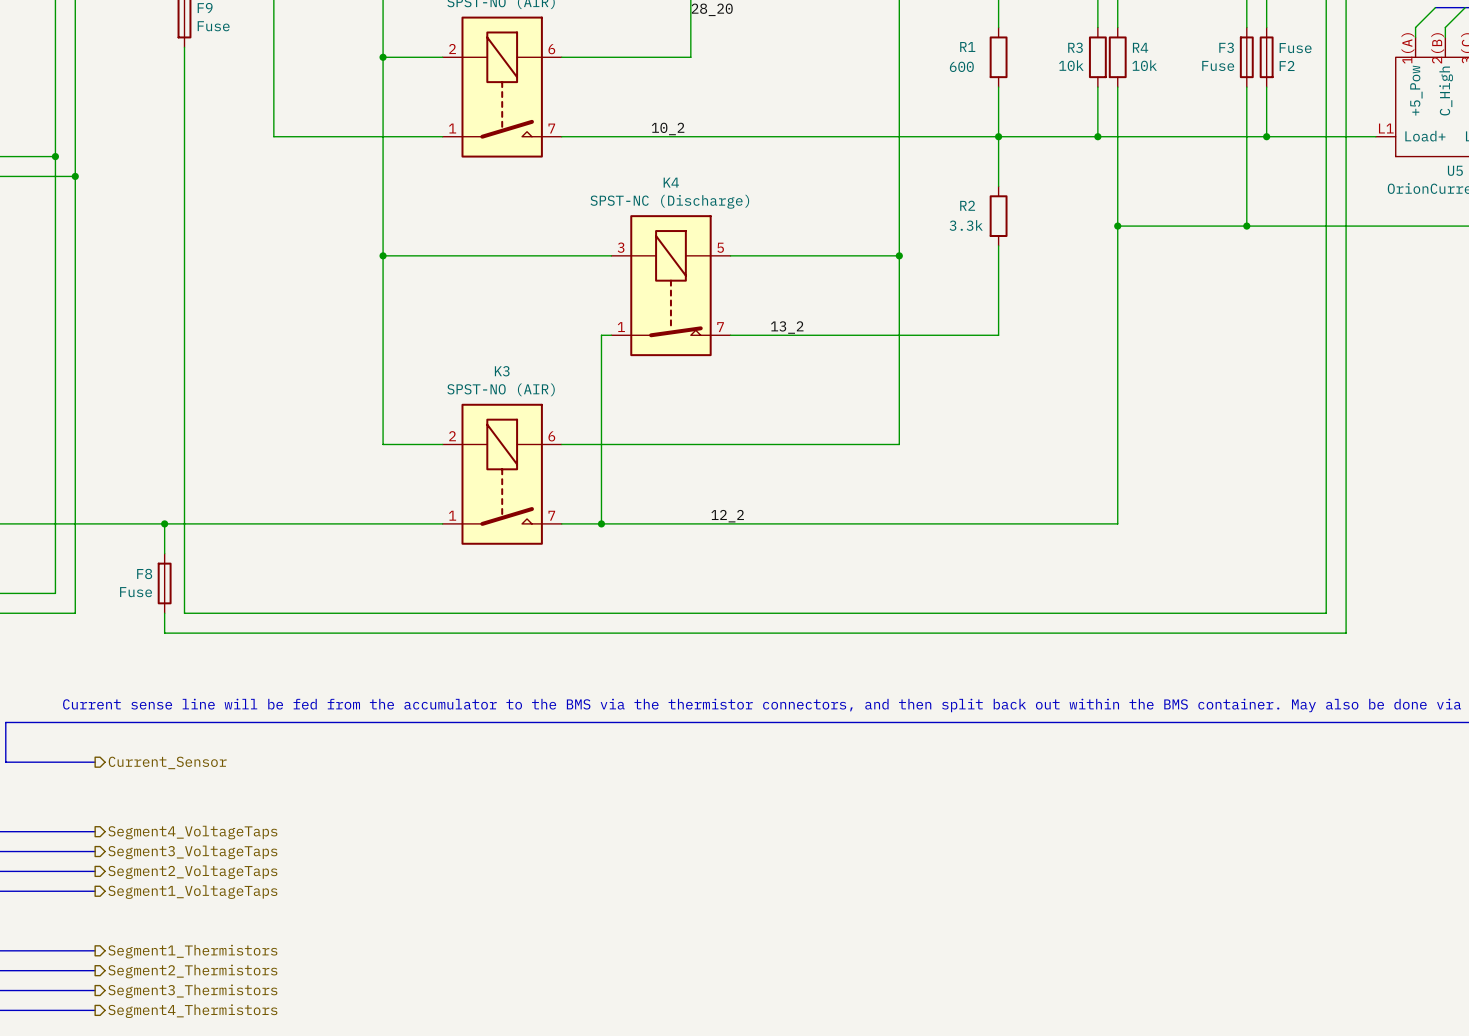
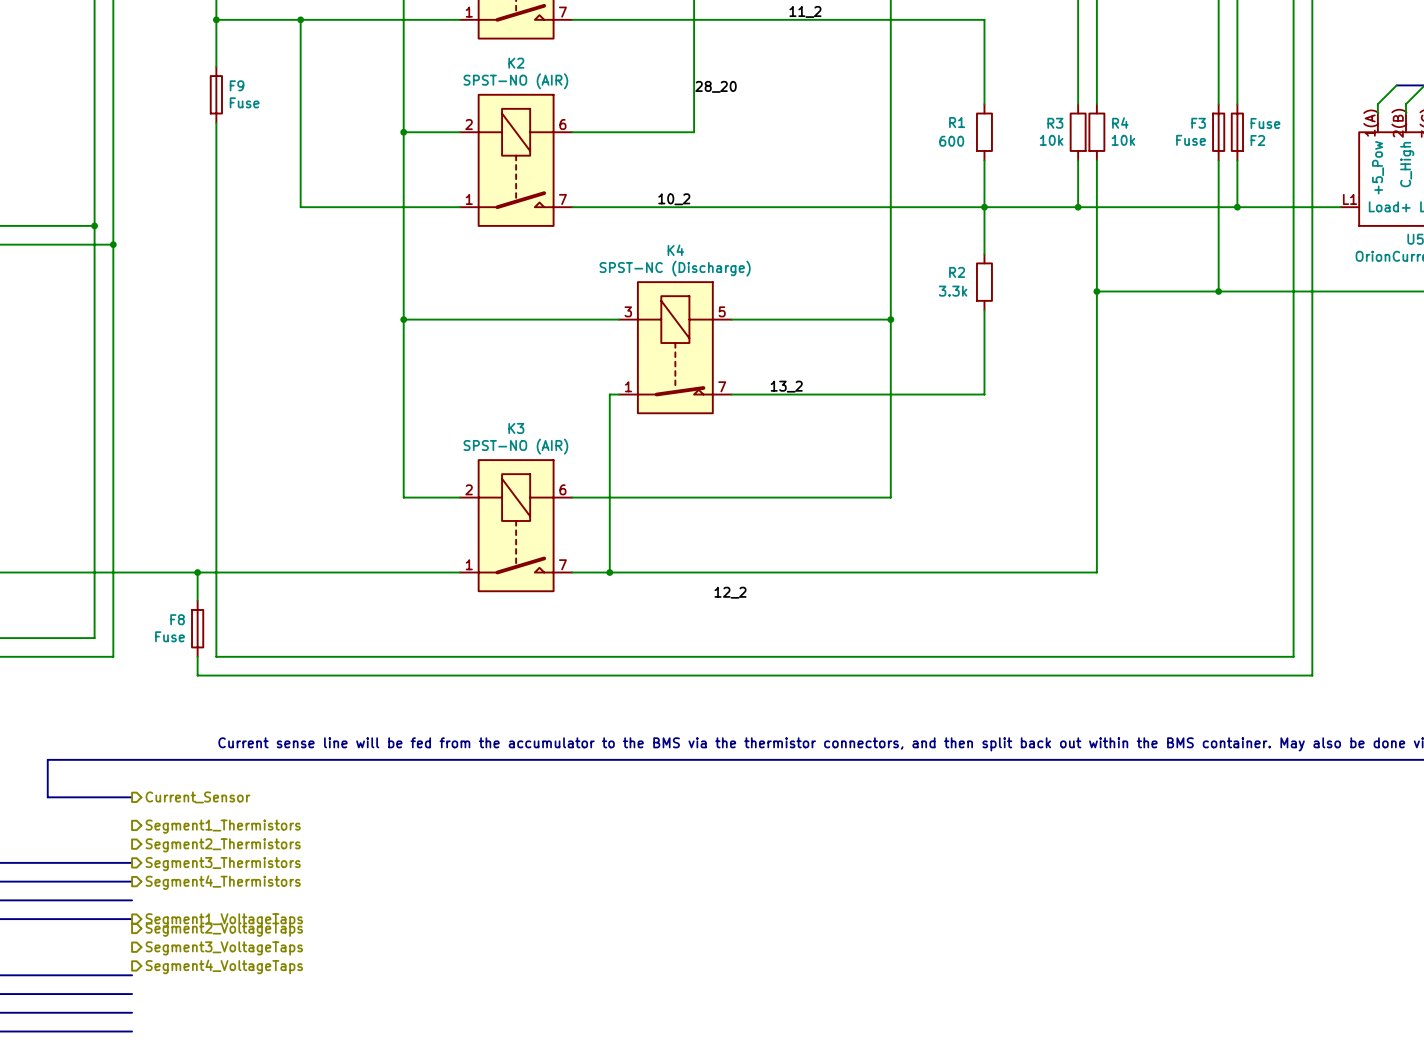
label position: 12_2 (727, 516) -> 12_2 (730, 592)
hierarchical label: Segment4_VoltageTaps (192, 832) -> Segment3_Thermistors (223, 864)
hierarchical label: Segment3_VoltageTaps (192, 852) -> Segment4_Thermistors (223, 882)
hierarchical label position: Segment2_VoltageTaps (192, 872) -> Segment2_VoltageTaps (224, 929)
hierarchical label: none -> Segment3_VoltageTaps (224, 948)
hierarchical label: none -> Segment4_VoltageTaps (224, 966)
hierarchical label position: Segment1_Thermistors (192, 951) -> Segment1_Thermistors (223, 826)
hierarchical label position: Segment2_Thermistors (192, 971) -> Segment2_Thermistors (223, 845)
hierarchical label: Segment3_Thermistors (192, 991) -> none
hierarchical label: Segment4_Thermistors (192, 1011) -> none

